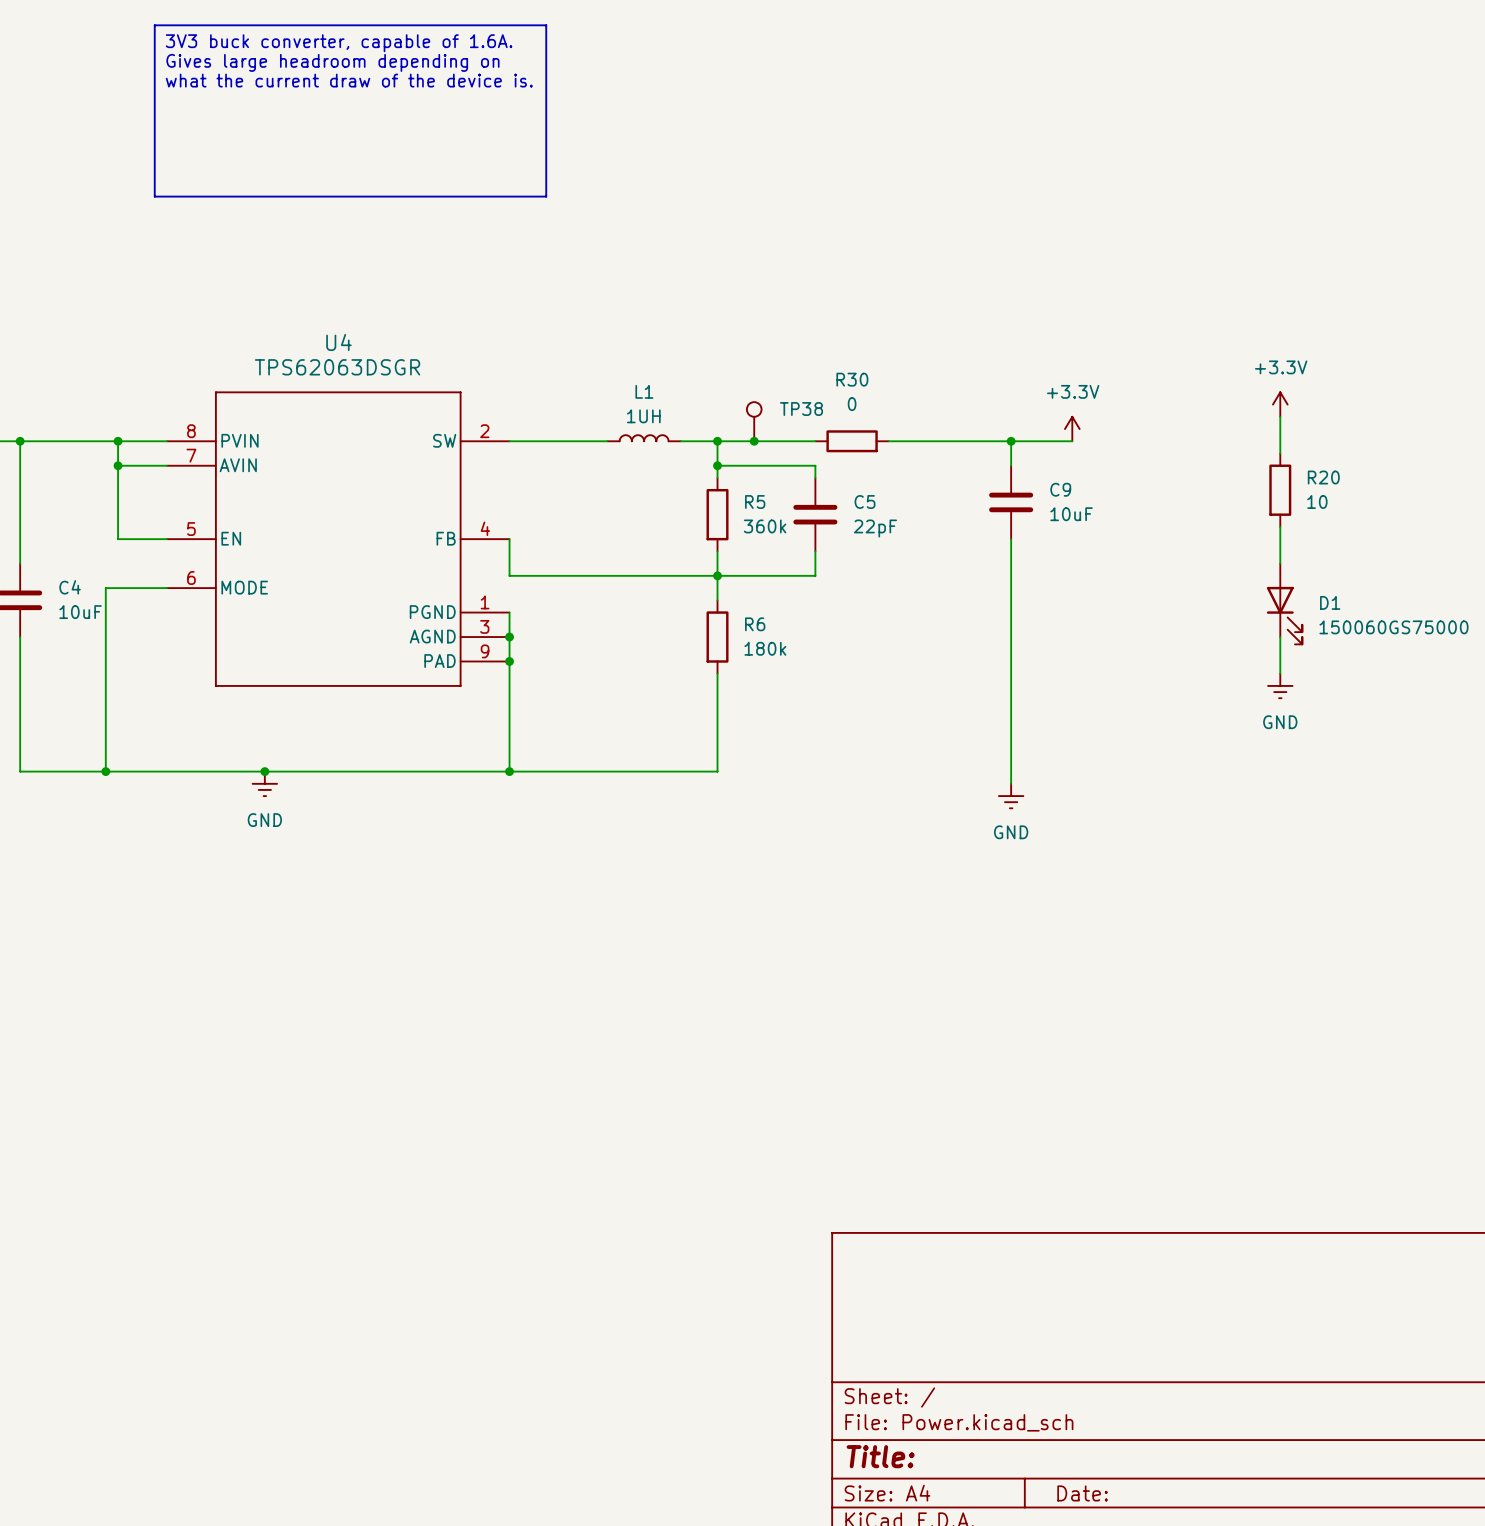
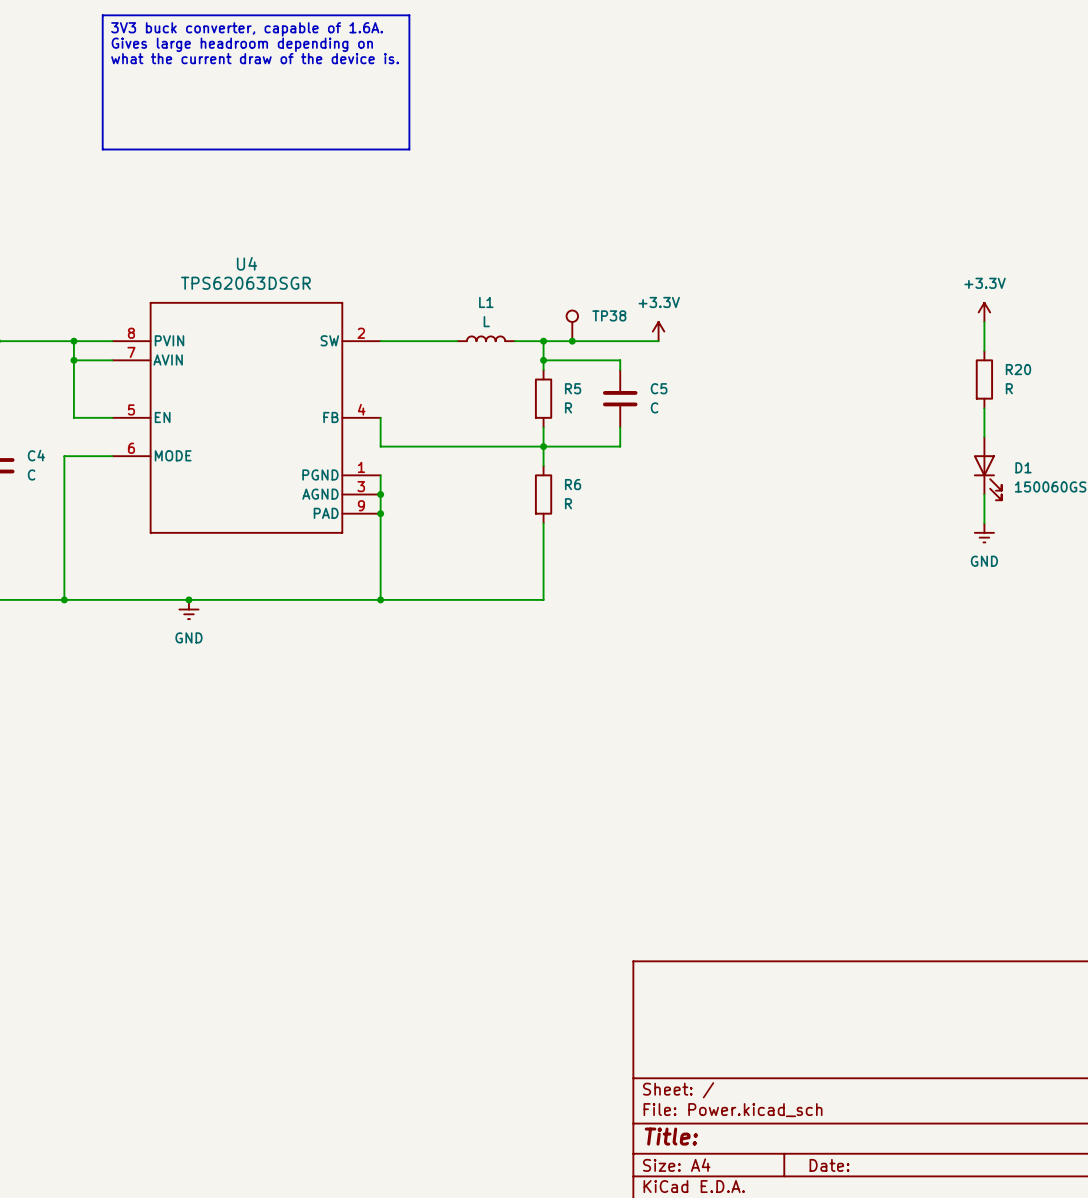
L1 value: 1UH (643, 416) -> L (486, 321)
power symbol position: +3.3V (1072, 429) -> +3.3V (658, 331)
wire: none -> (620, 341) (658, 341)
R30: 0 (852, 441) -> none
wire: (888, 441) (1072, 441) -> none
wire: (1011, 441) (1011, 465) -> none
junction: (1011, 441) -> none
R20 value: 10 (1317, 501) -> R (1009, 388)
C9: 10uF (1011, 502) -> none
R5 value: 360k (765, 526) -> R (568, 407)
C5 value: 22pF (875, 528) -> C (654, 407)
wire: (1011, 539) (1011, 783) -> none
C4 value: 10uF (80, 612) -> C (31, 474)
R6 value: 180k (765, 648) -> R (568, 503)
power symbol: GND (1011, 796) -> none

